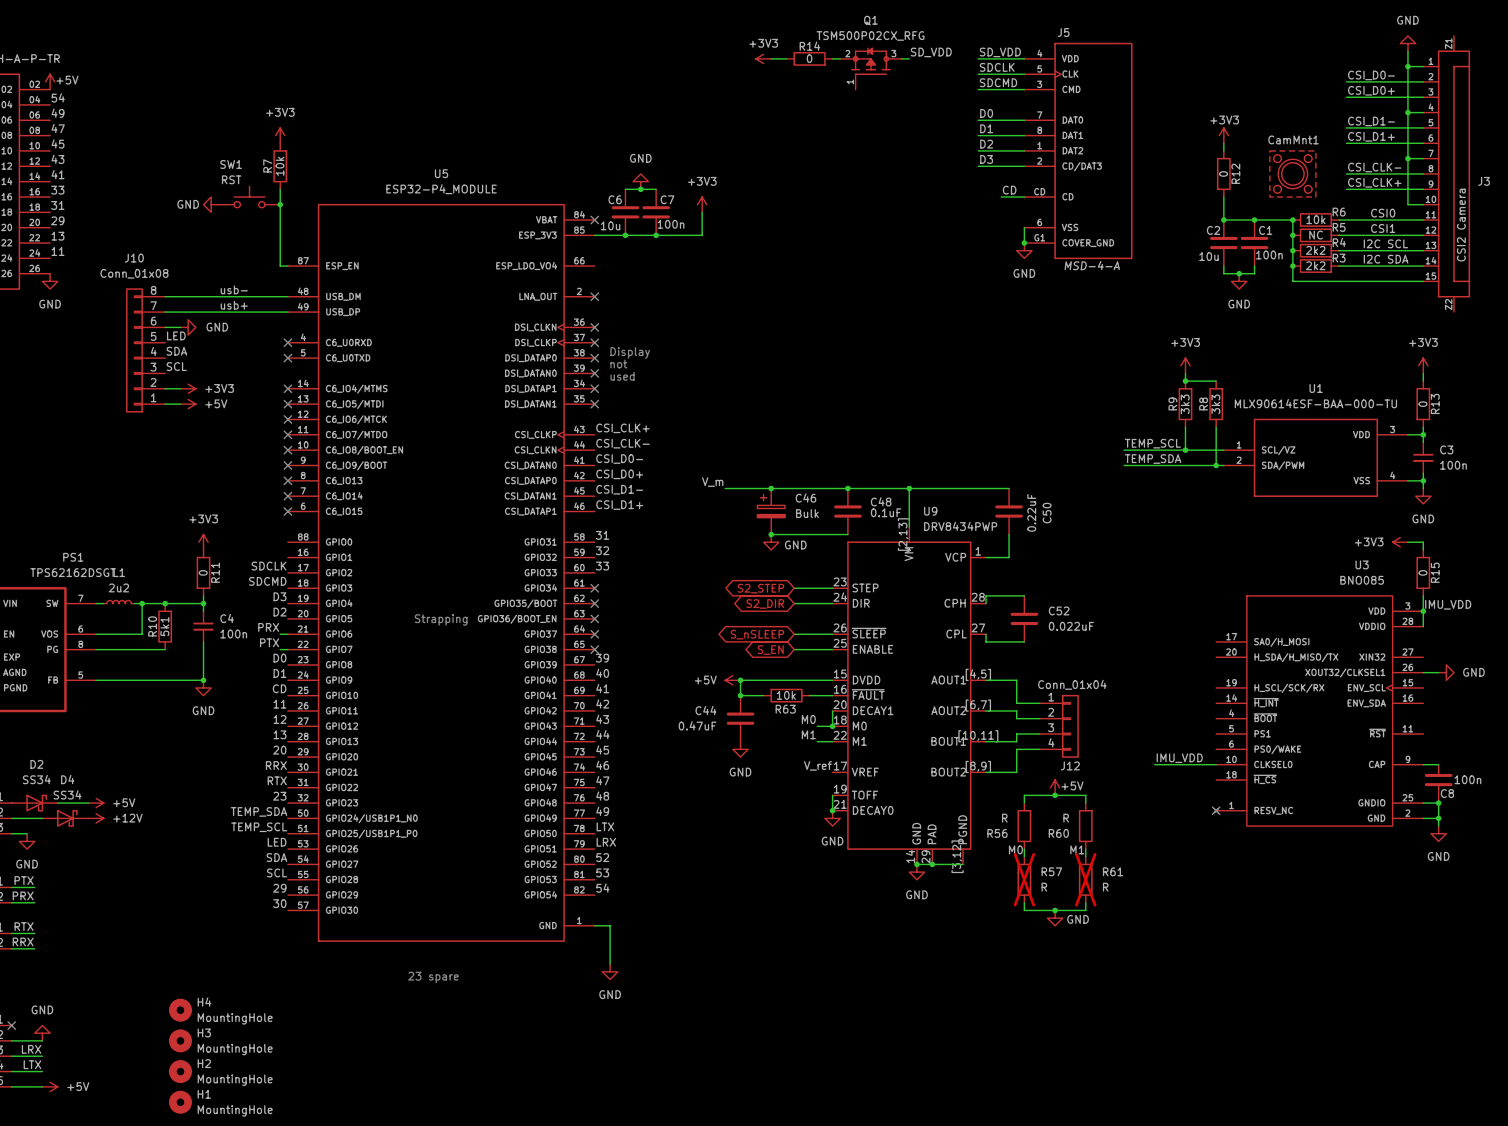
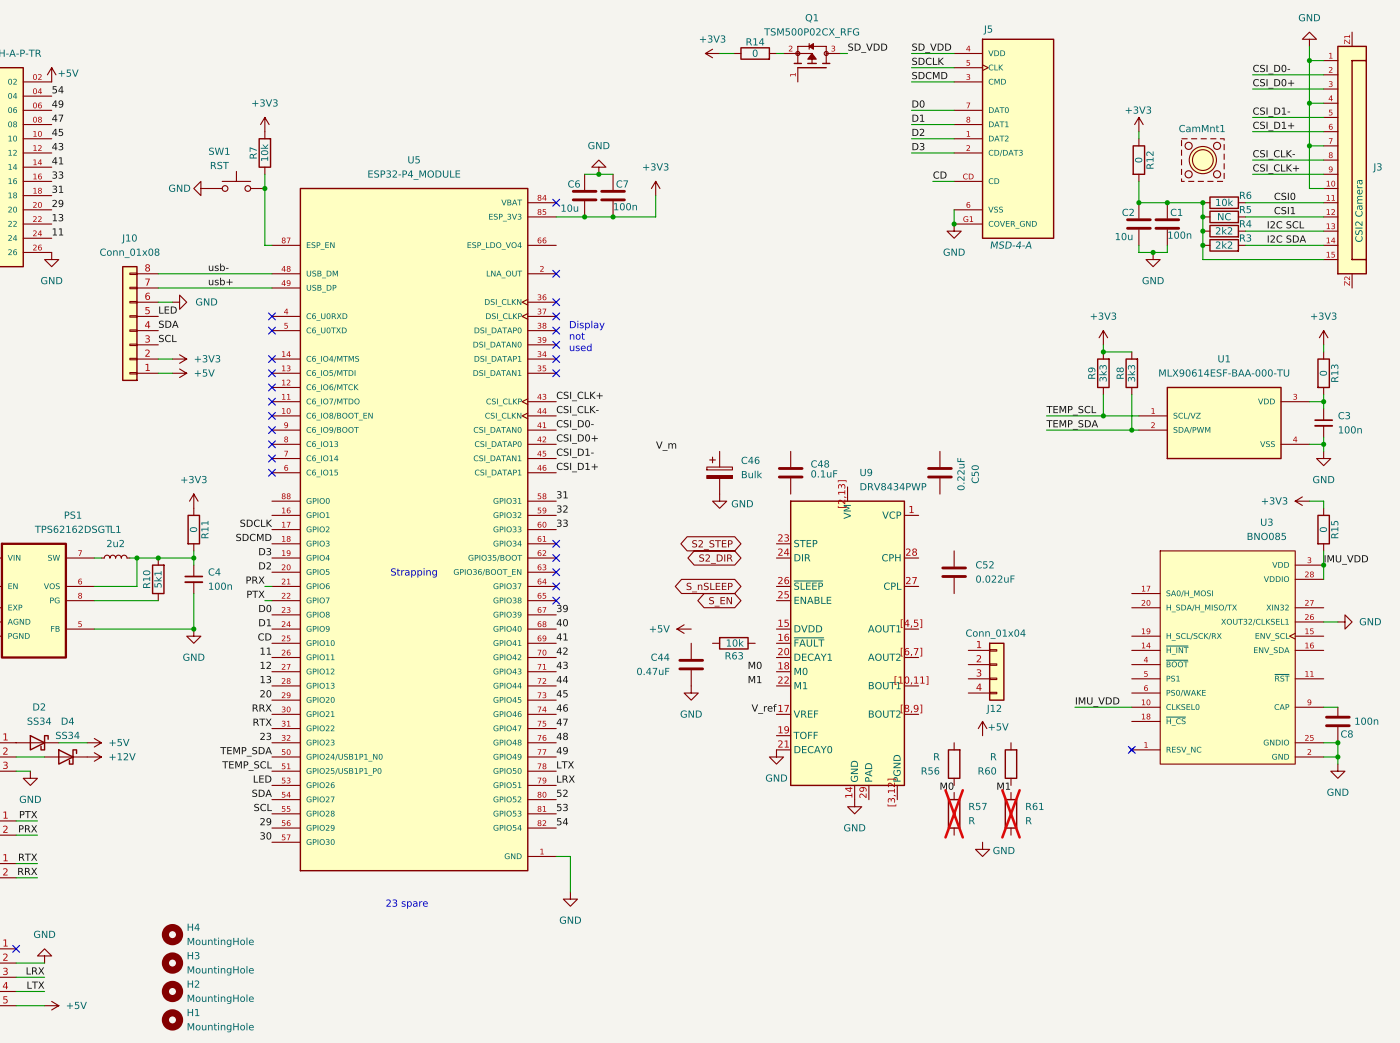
wire: (725, 488) (1009, 488) -> none
junction: (771, 488) -> none
junction: (847, 488) -> none
wire: (909, 488) (909, 526) -> none
junction: (909, 488) -> none
wire: (771, 534) (847, 534) -> none
junction: (771, 534) -> none
wire: (1009, 534) (1009, 557) (986, 557) -> none
wire: (794, 588) (832, 588) -> none
wire: (1024, 595) (986, 595) (986, 603) -> none
wire: (794, 603) (832, 603) -> none
wire: (794, 634) (832, 634) -> none
wire: (986, 634) (986, 641) (1024, 641) -> none
wire: (794, 649) (832, 649) -> none
junction: (740, 680) -> none
wire: (832, 680) (740, 680) (740, 695) (763, 695) -> none
wire: (986, 680) (1016, 680) (1016, 703) (1039, 703) -> none
junction: (740, 695) -> none
wire: (809, 695) (832, 695) -> none
wire: (832, 710) (832, 726) (817, 726) -> none
wire: (986, 710) (1016, 710) (1016, 718) (1039, 718) -> none
junction: (832, 726) -> none
wire: (1039, 734) (1016, 734) (1016, 741) (986, 741) -> none
wire: (817, 741) (832, 741) -> none
wire: (1039, 749) (1016, 749) (1016, 772) (986, 772) -> none
wire: (832, 795) (832, 810) -> none
junction: (1055, 795) -> none
wire: (1024, 803) (1024, 795) (1085, 795) (1085, 803) -> none
junction: (832, 810) -> none
wire: (1024, 849) (1024, 856) -> none
wire: (1085, 849) (1085, 856) -> none
wire: (916, 864) (963, 864) -> none
junction: (916, 864) -> none
junction: (932, 864) -> none
wire: (1024, 902) (1024, 910) (1085, 910) (1085, 902) -> none
junction: (1055, 910) -> none

